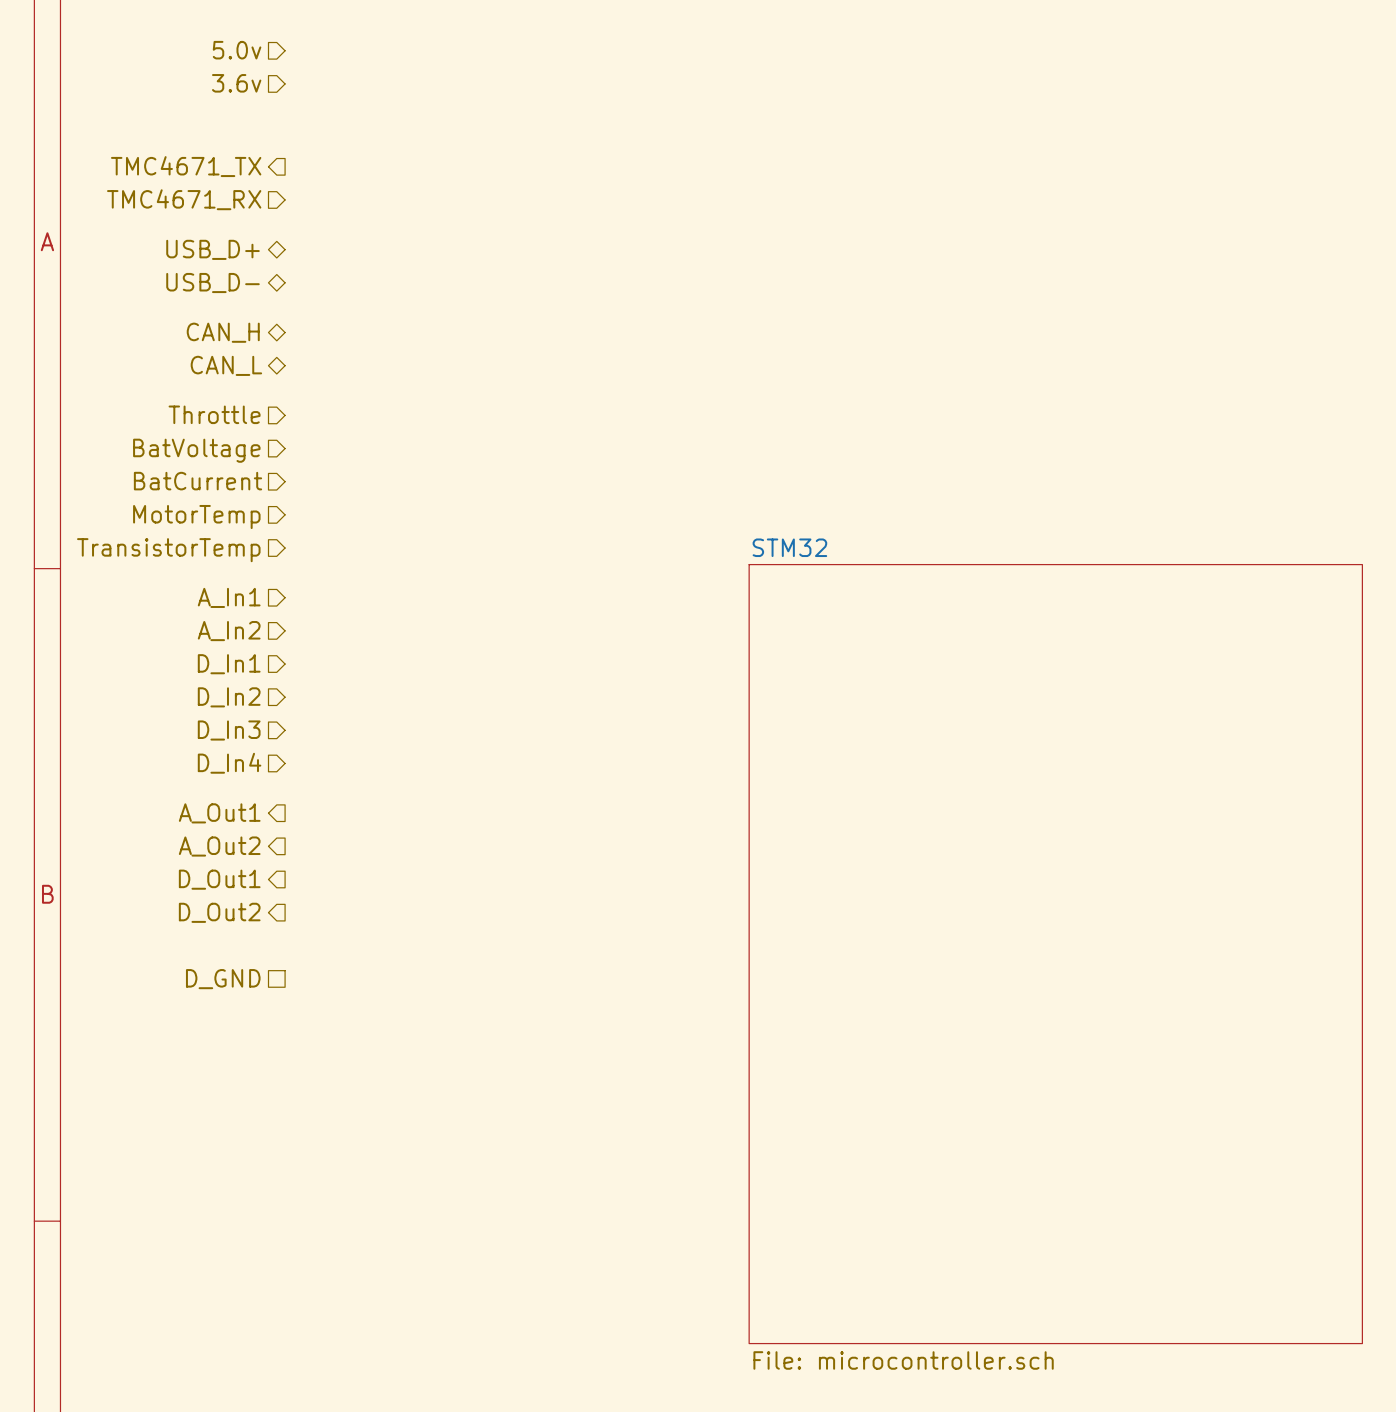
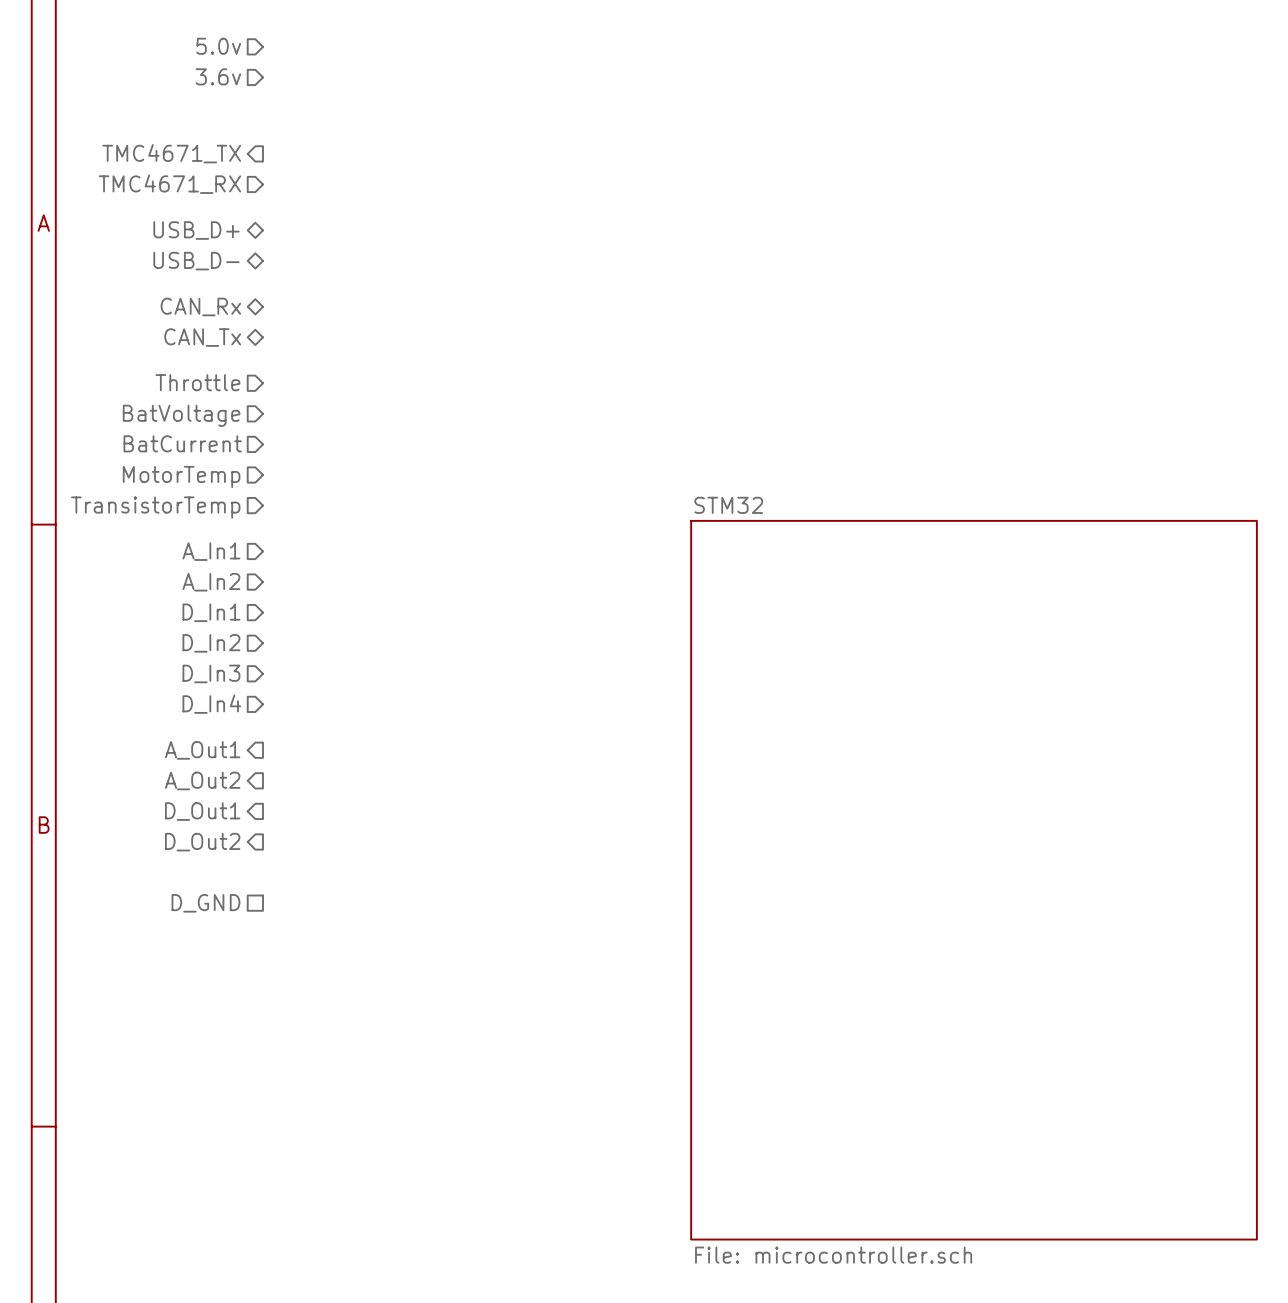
hierarchical label: CAN_H (223, 332) -> CAN_Rx (200, 306)
hierarchical label: CAN_L (226, 365) -> CAN_Tx (202, 337)

